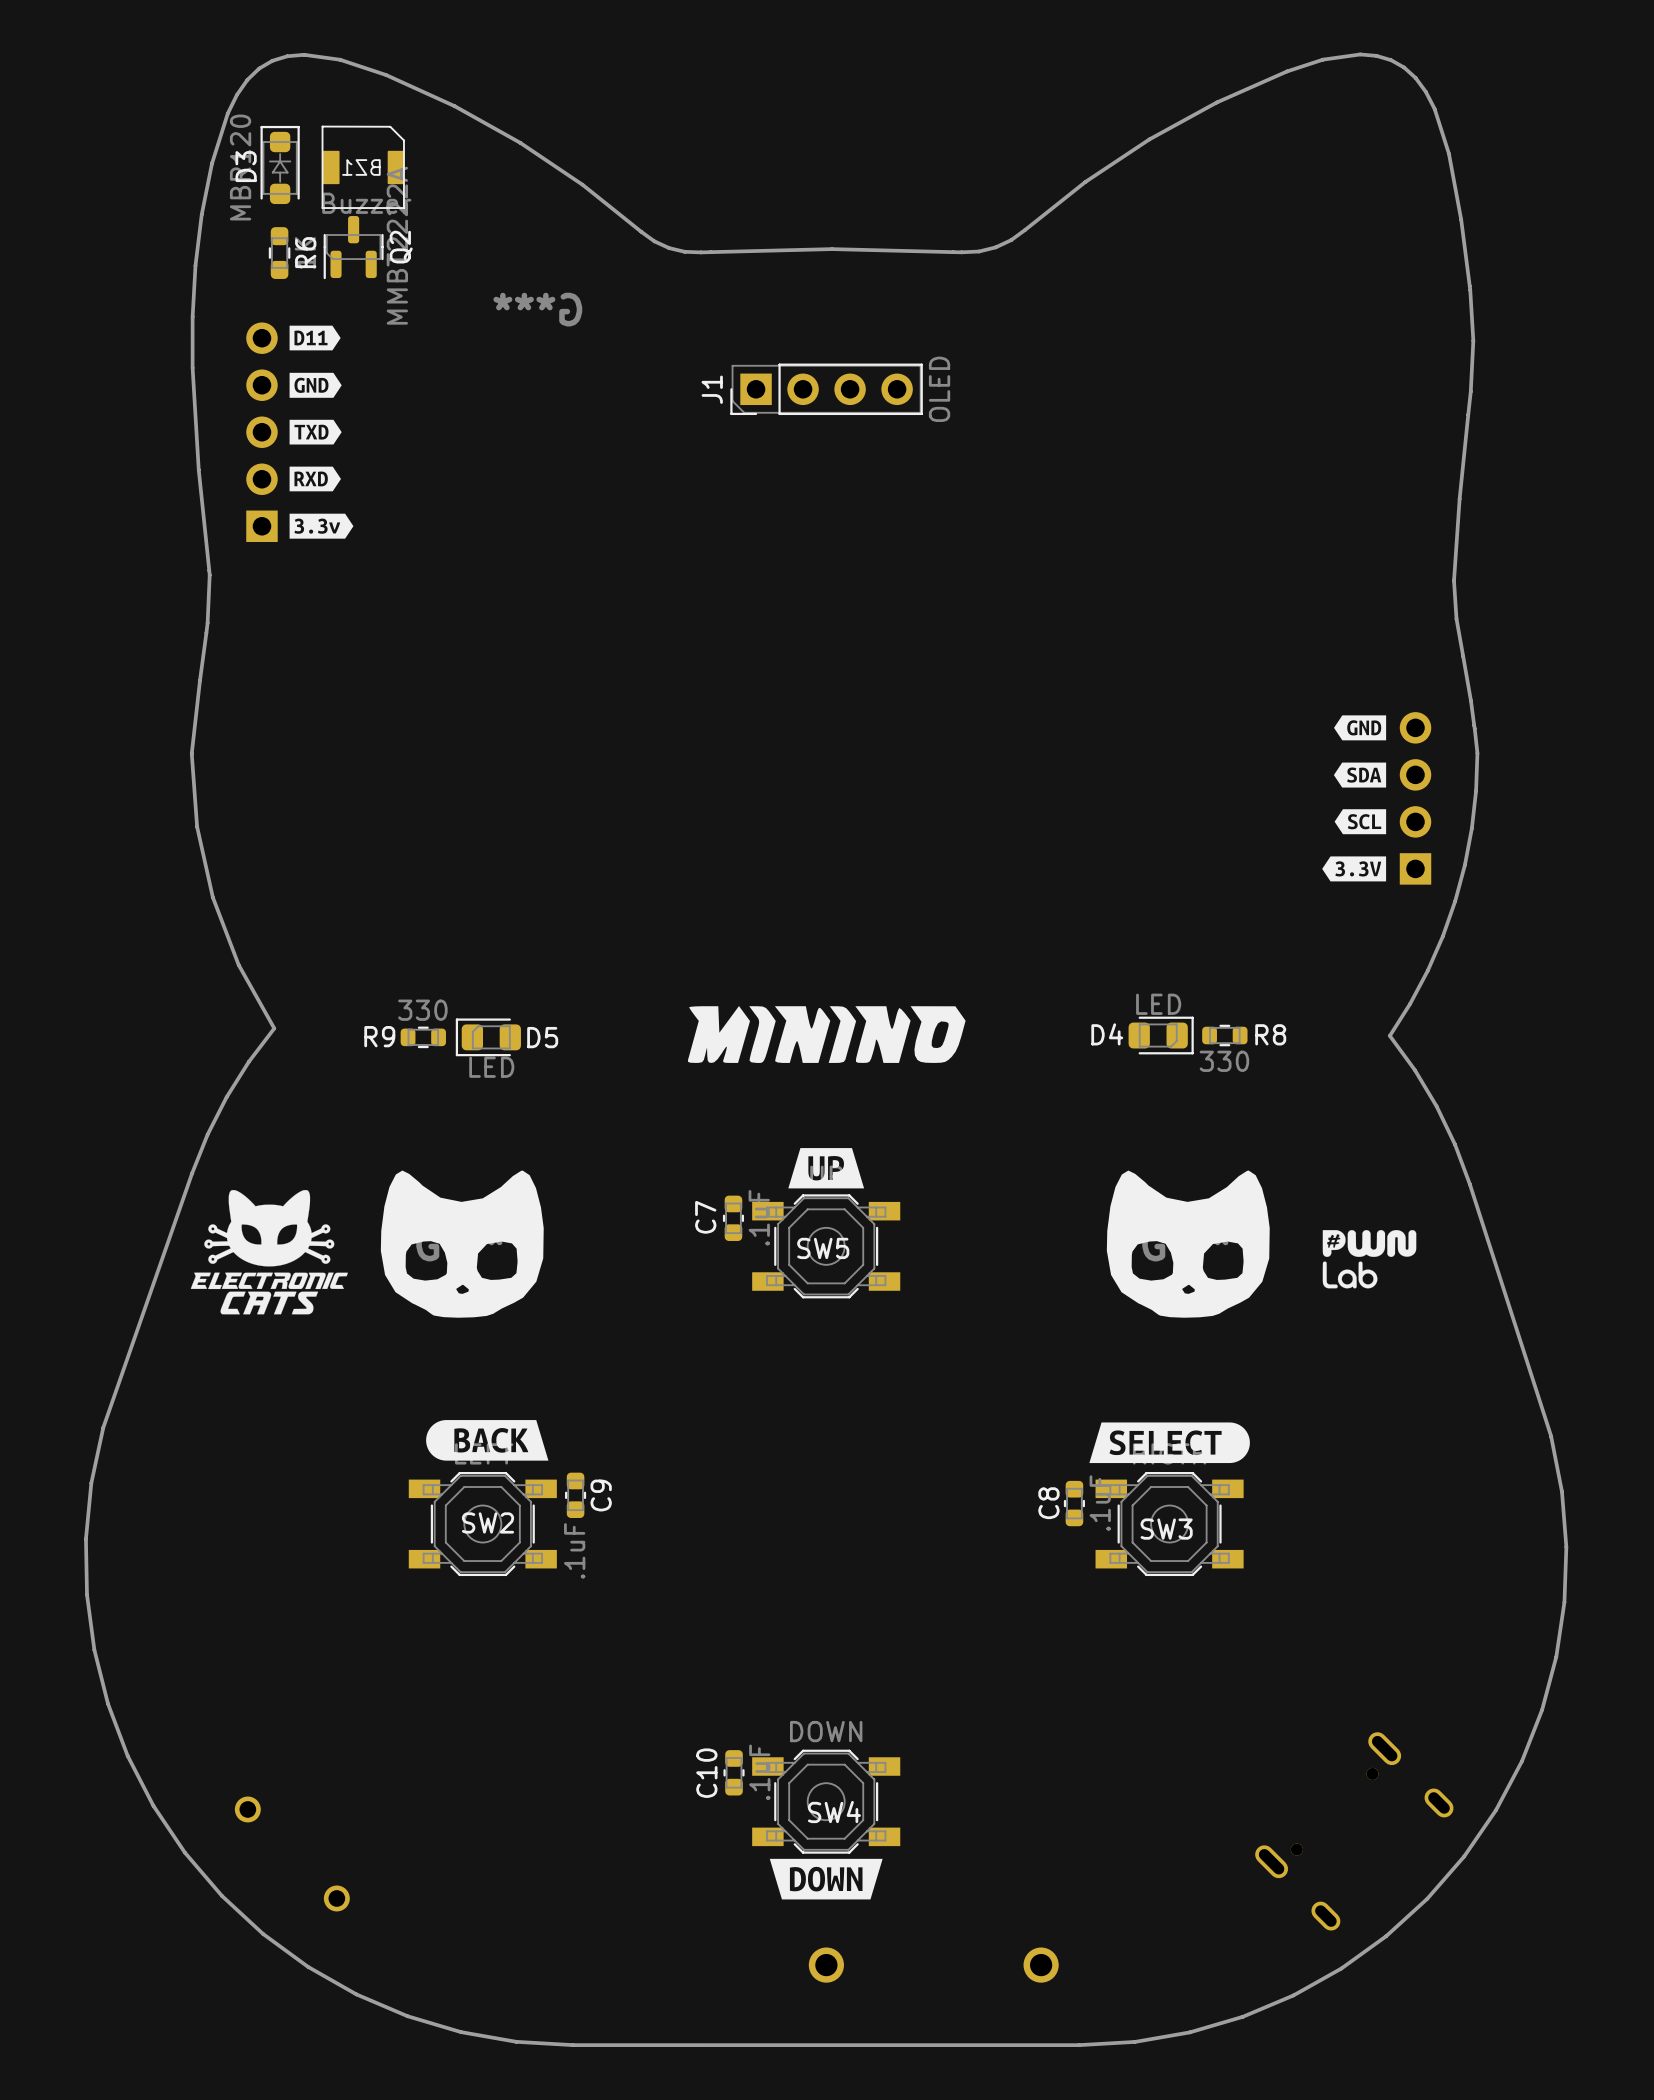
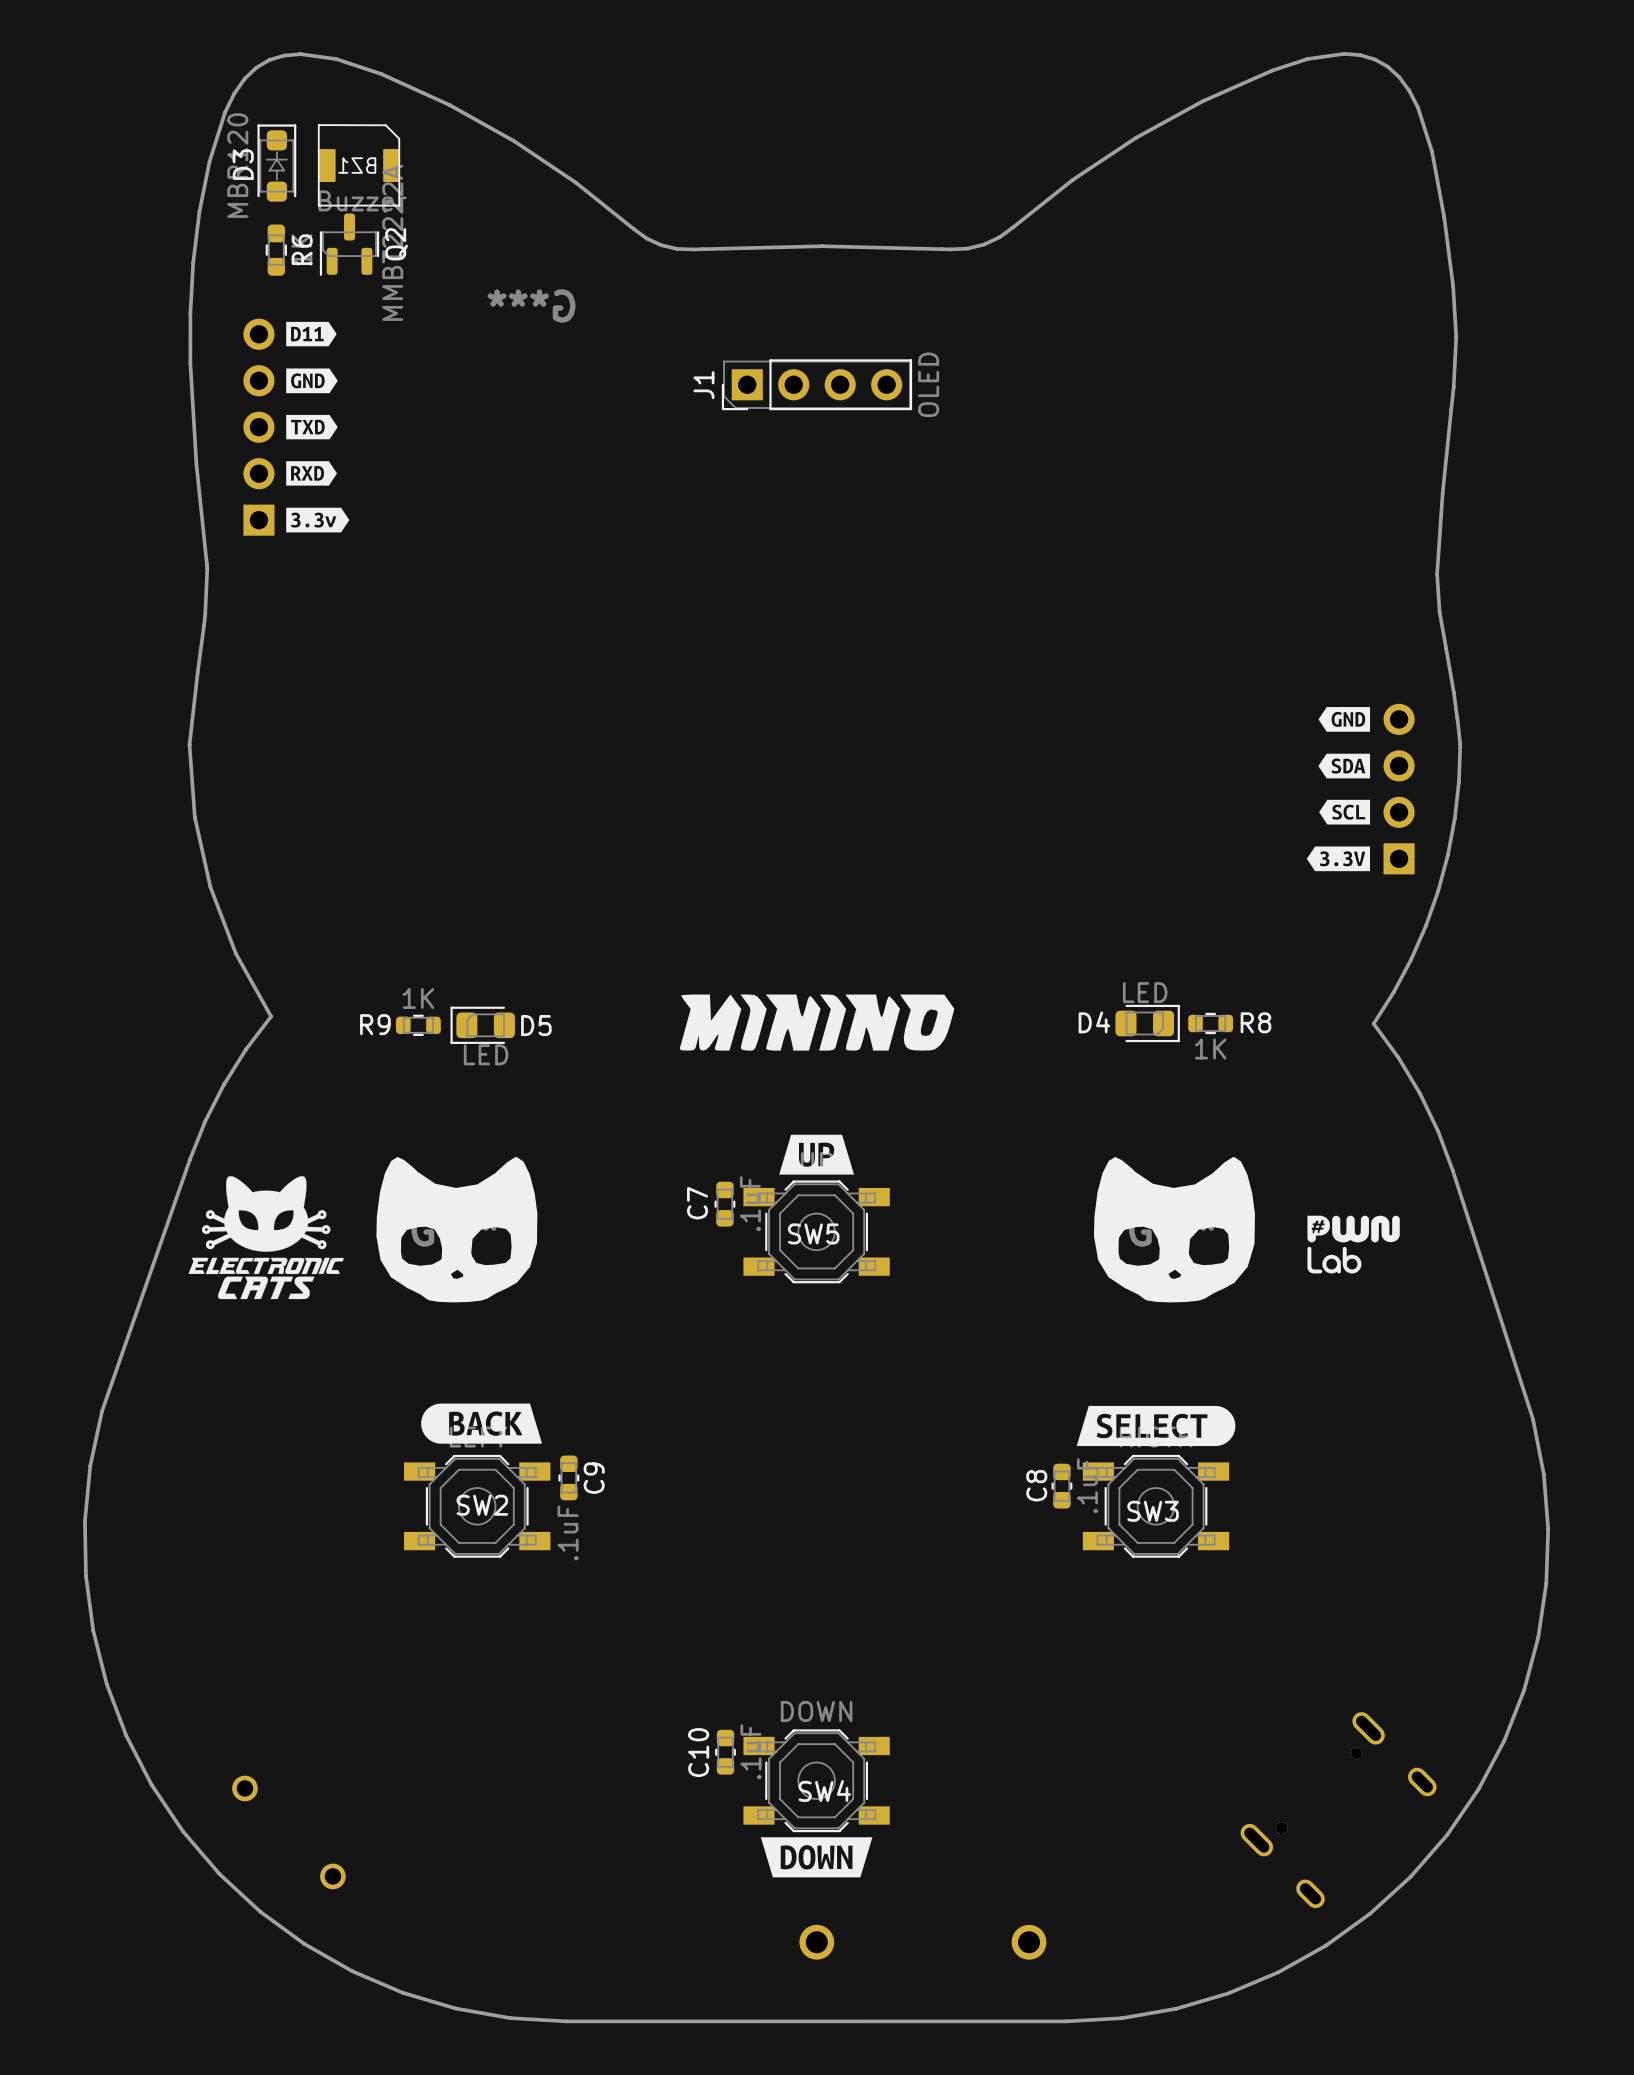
R9 value: 330 (422, 1010) -> 1K (418, 998)
R8 value: 330 (1224, 1061) -> 1K (1210, 1048)

